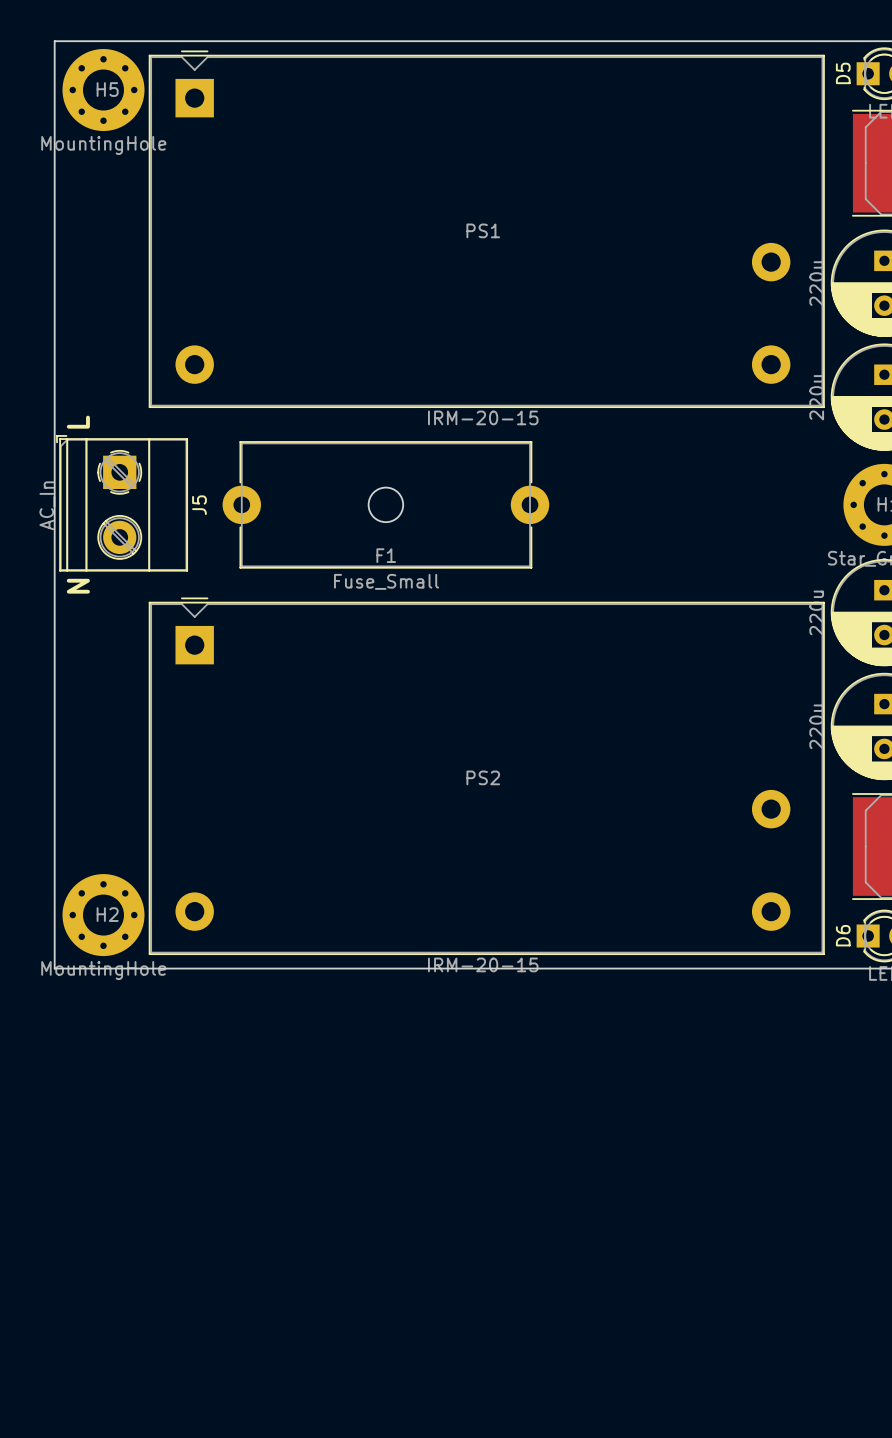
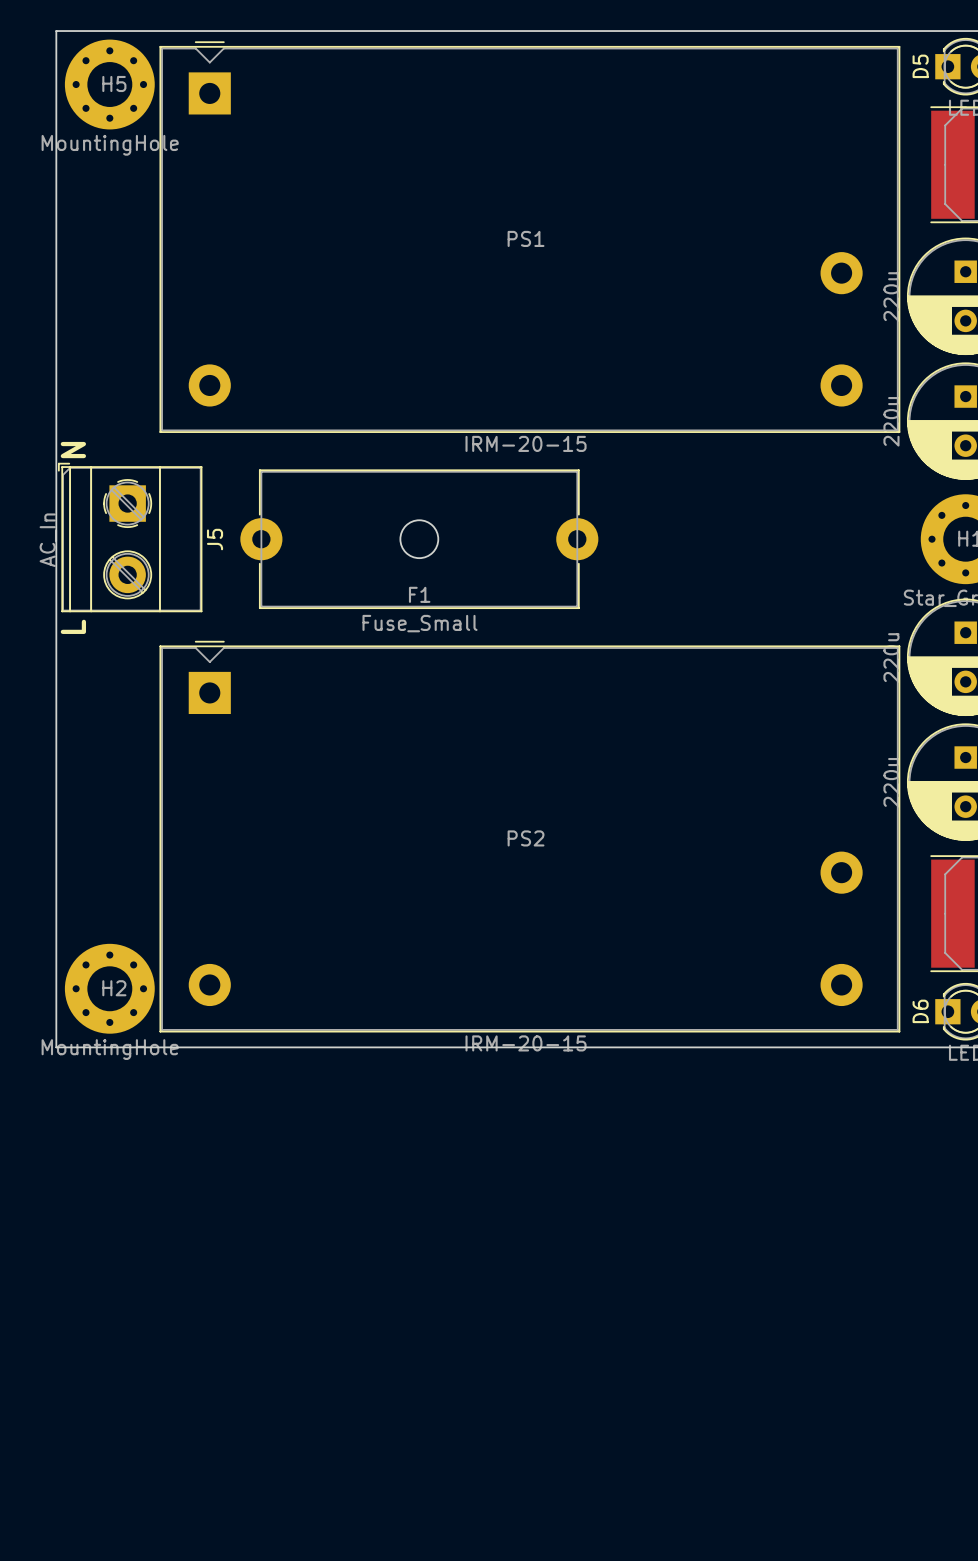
text: L (78, 422) -> N (73, 450)
text: N (78, 586) -> L (73, 626)

